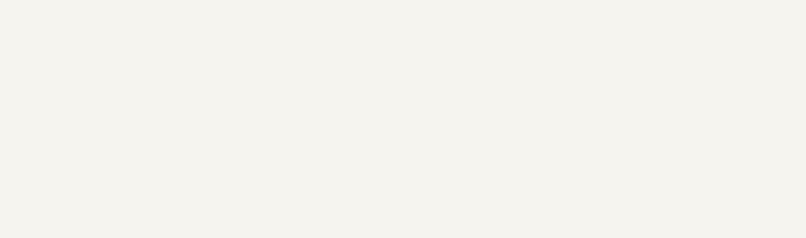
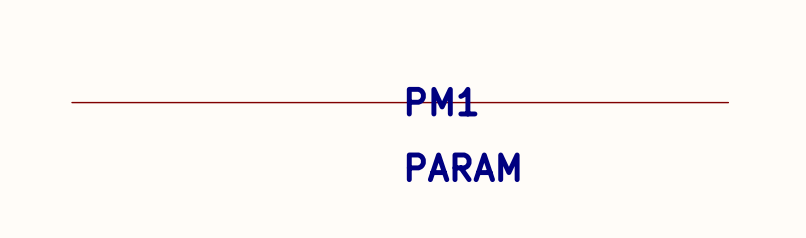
PM1: none -> PARAM (400, 102)

